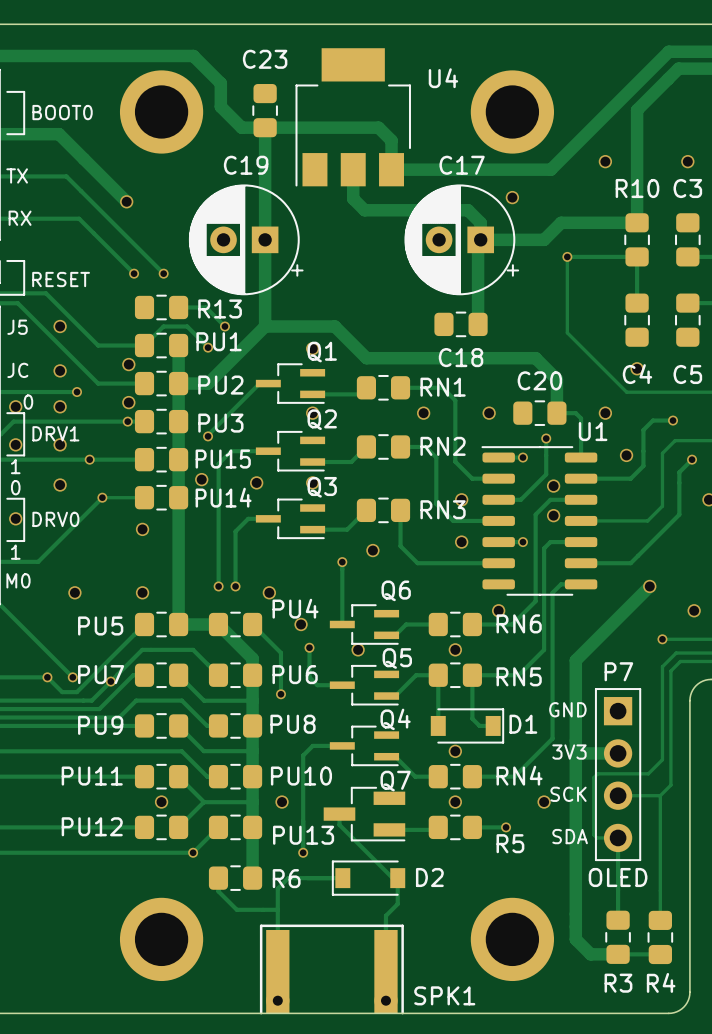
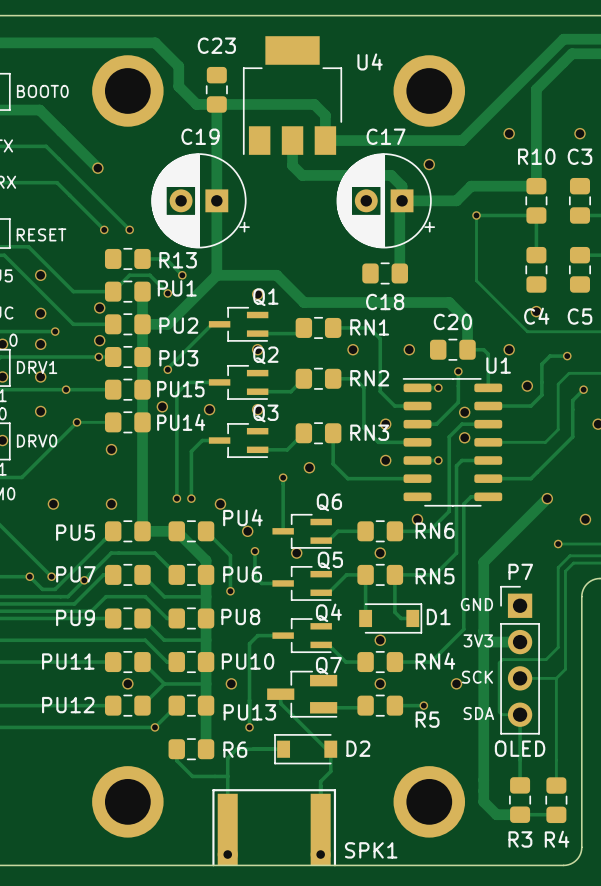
P7 footprint: [594, 688, 642, 862] -> [500, 585, 540, 735]

